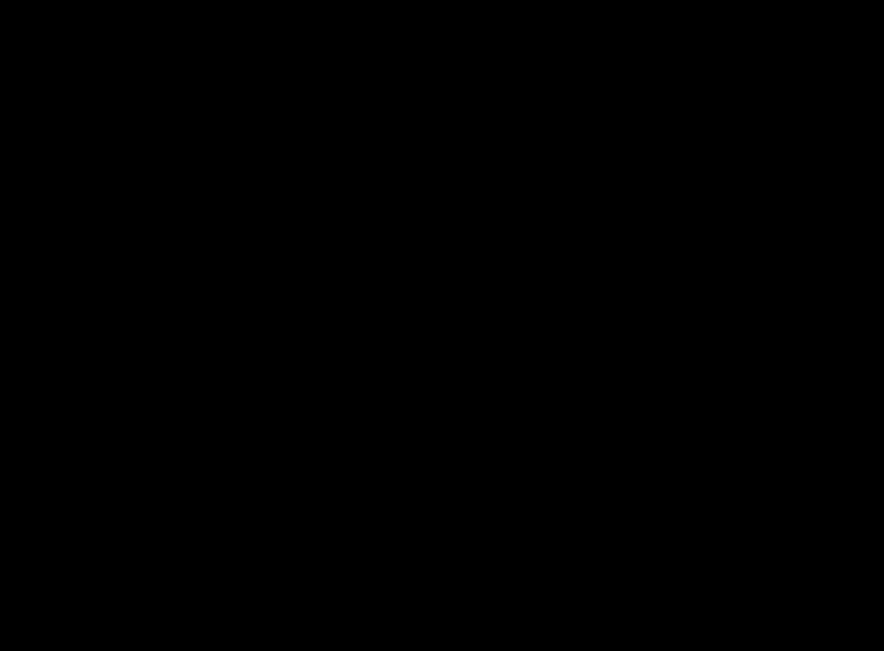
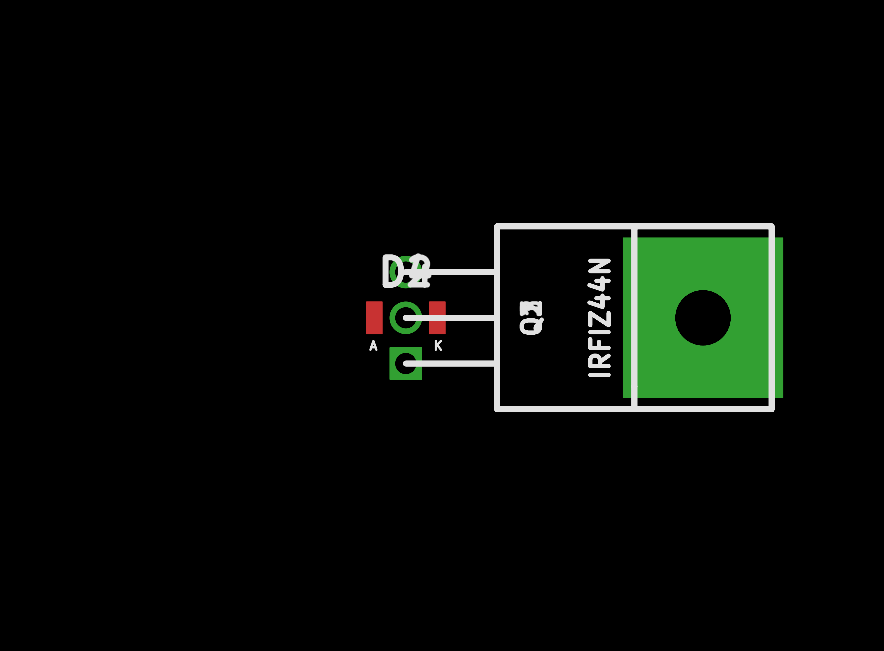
part: none -> (405, 317)
part: none -> (405, 317)
part: none -> IRFIZ44N (586, 317)
part: none -> IRFIZ44N (586, 317)
part: none -> IRFIZ44N (586, 317)

